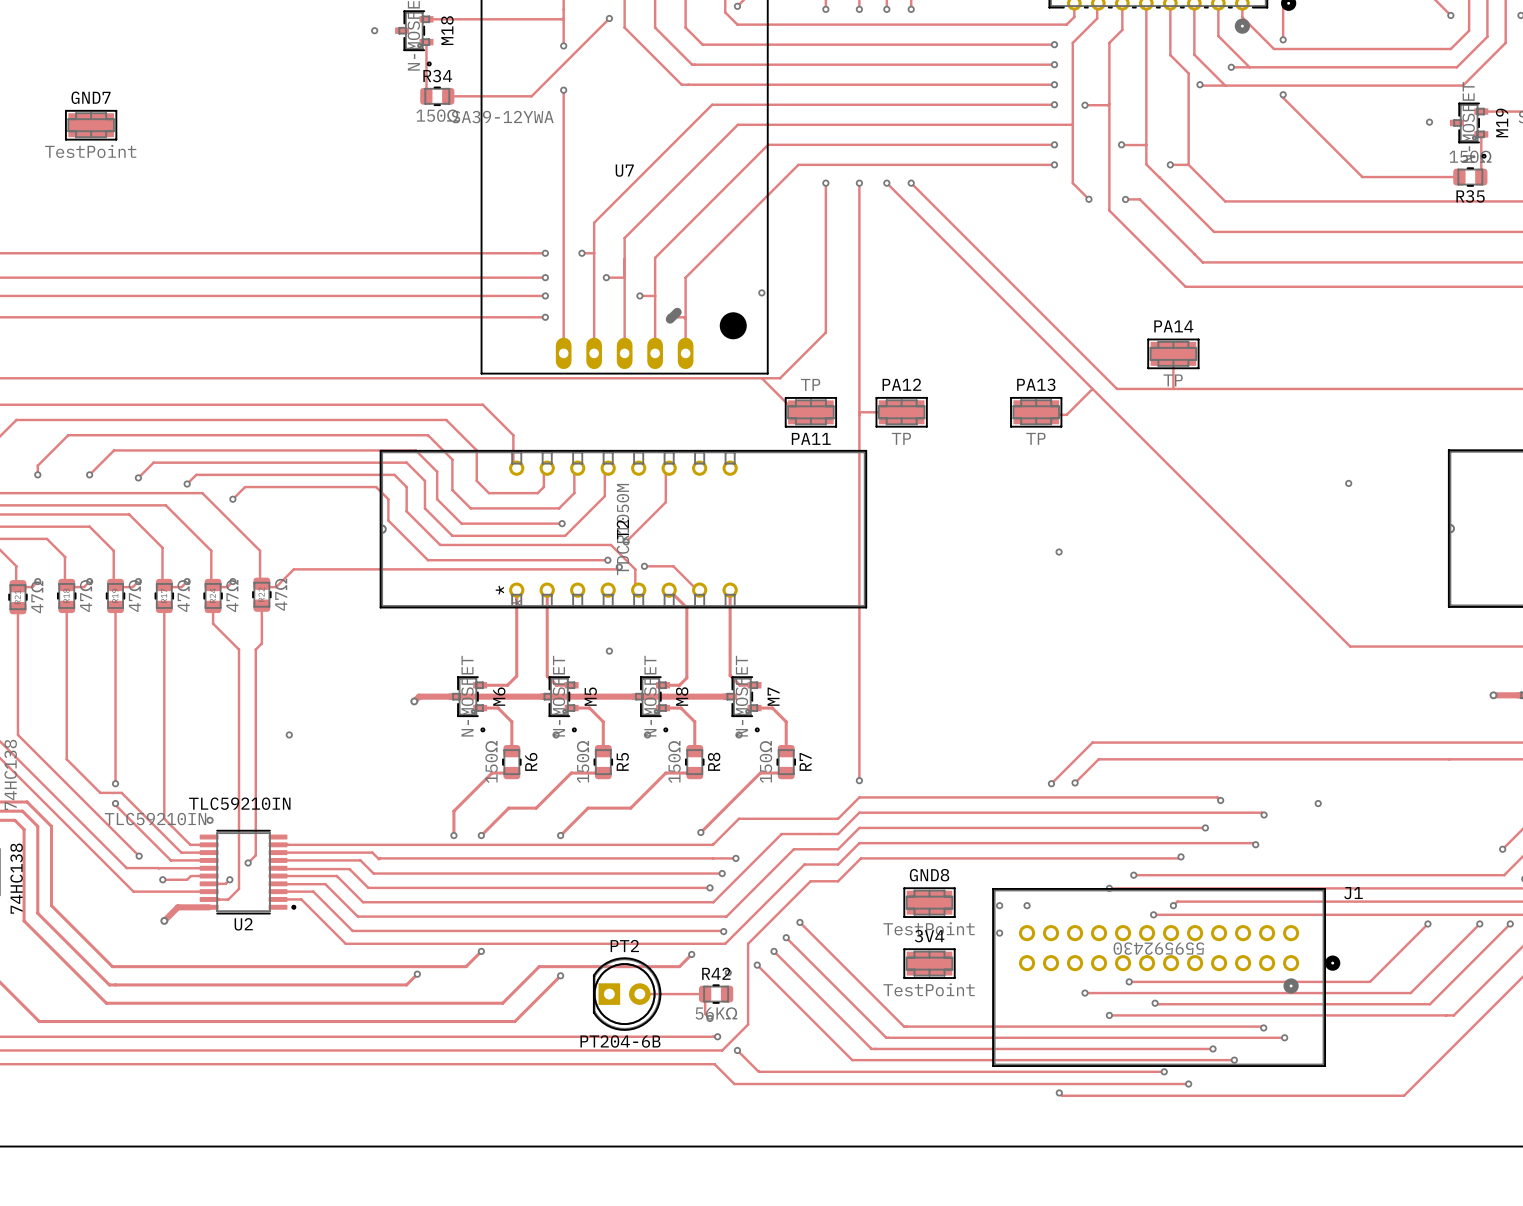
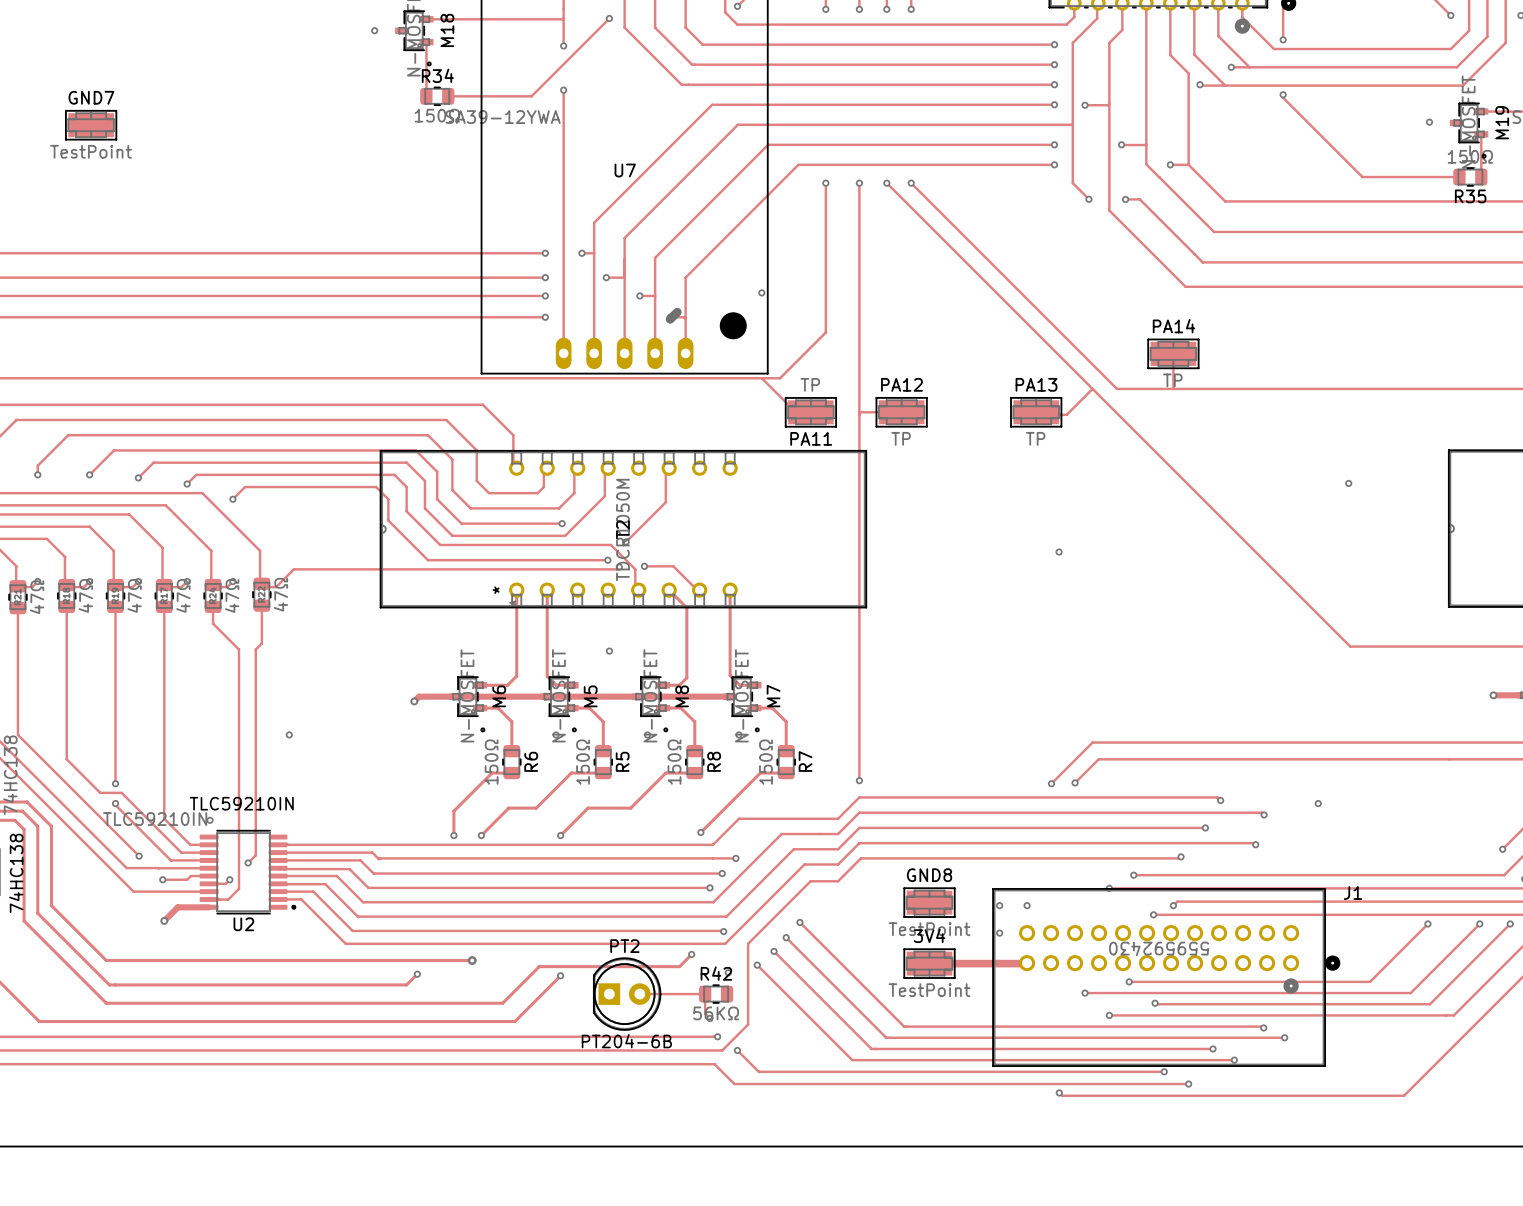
track: (481, 951) (466, 966) (112, 966) (106, 960) -> (472, 960) (106, 960)
via: (481, 951) -> none
via: none -> (472, 960)
track: none -> (1027, 963) (929, 963)

